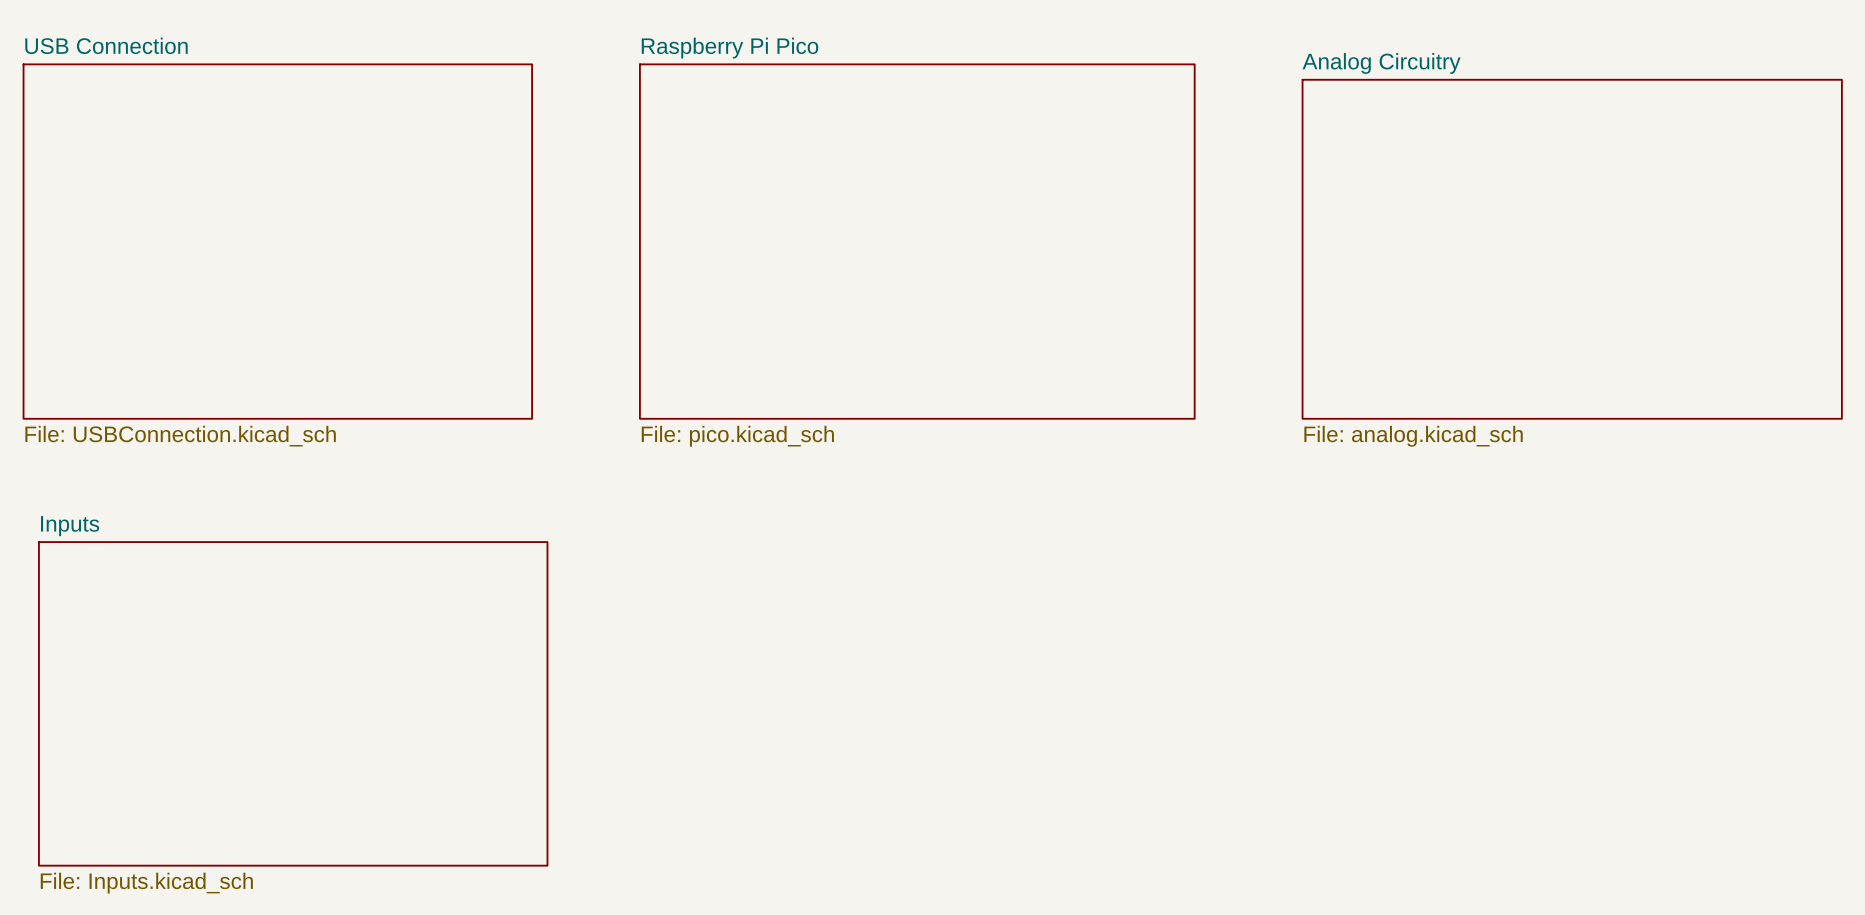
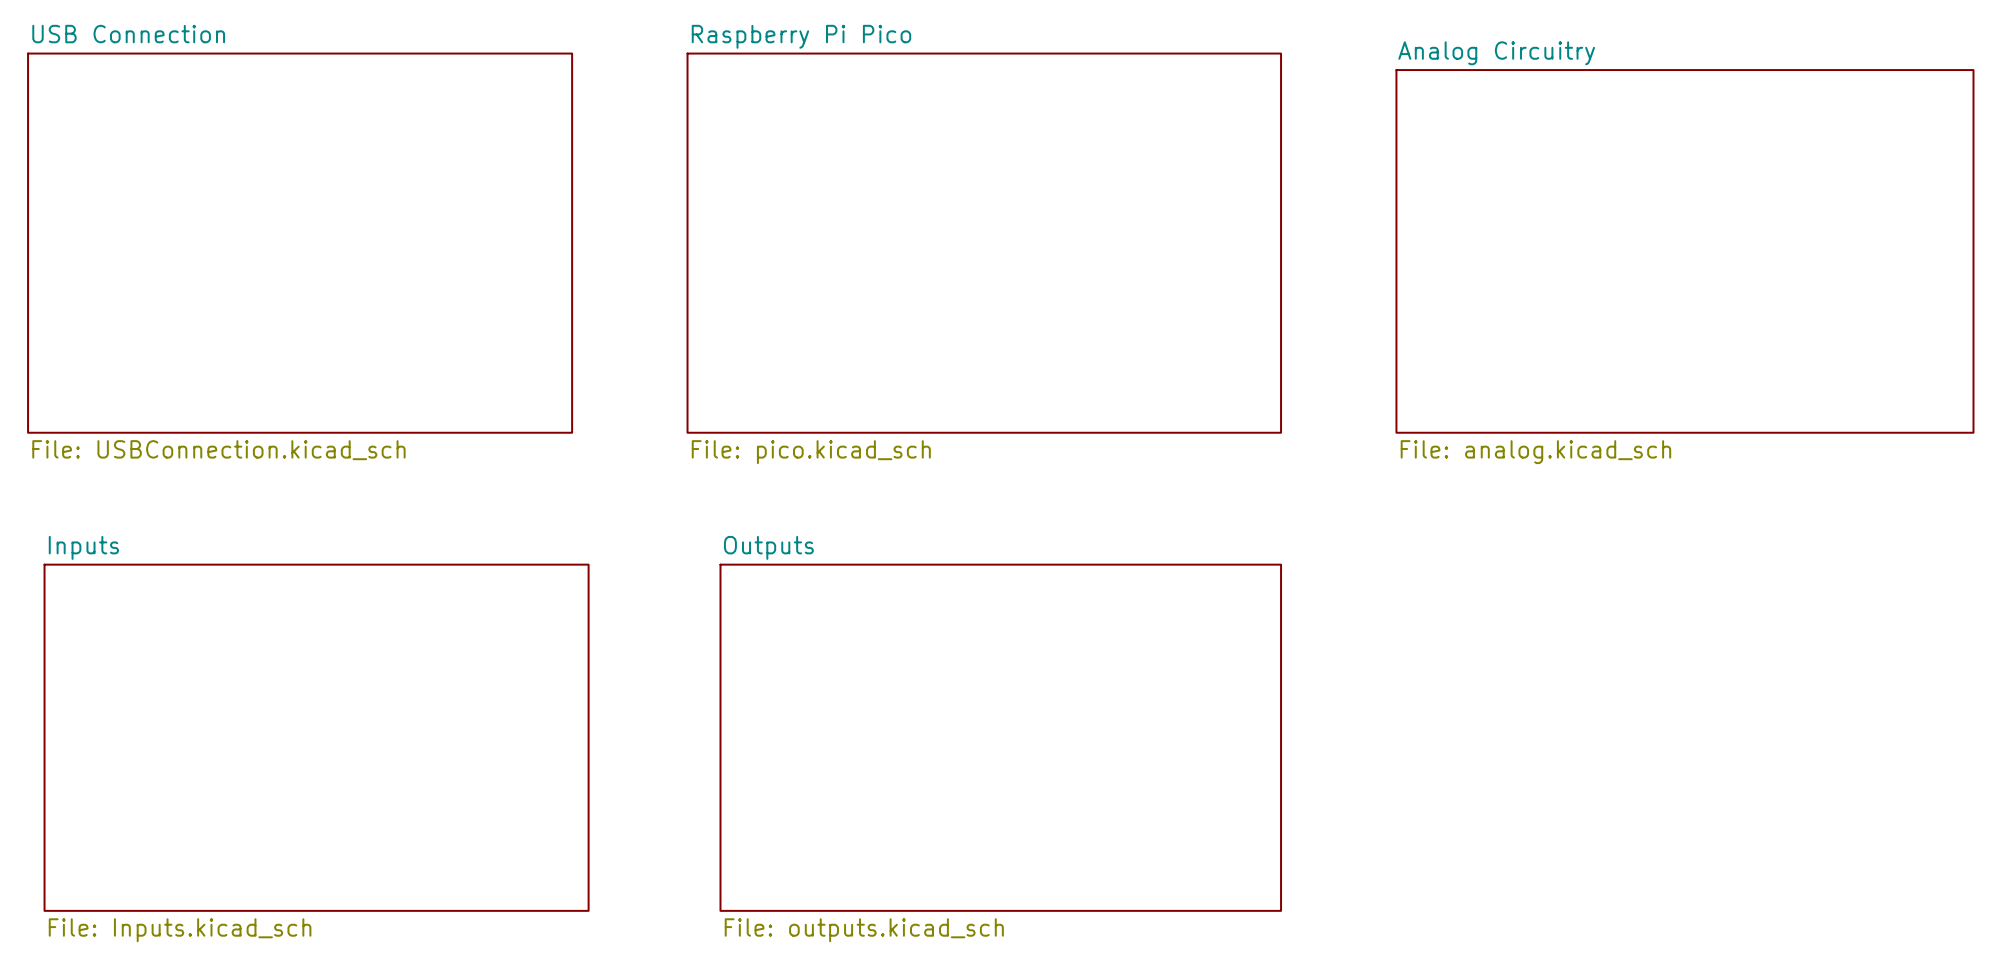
sheet Outputs: none -> File: outputs.kicad_sch (1000, 737)

